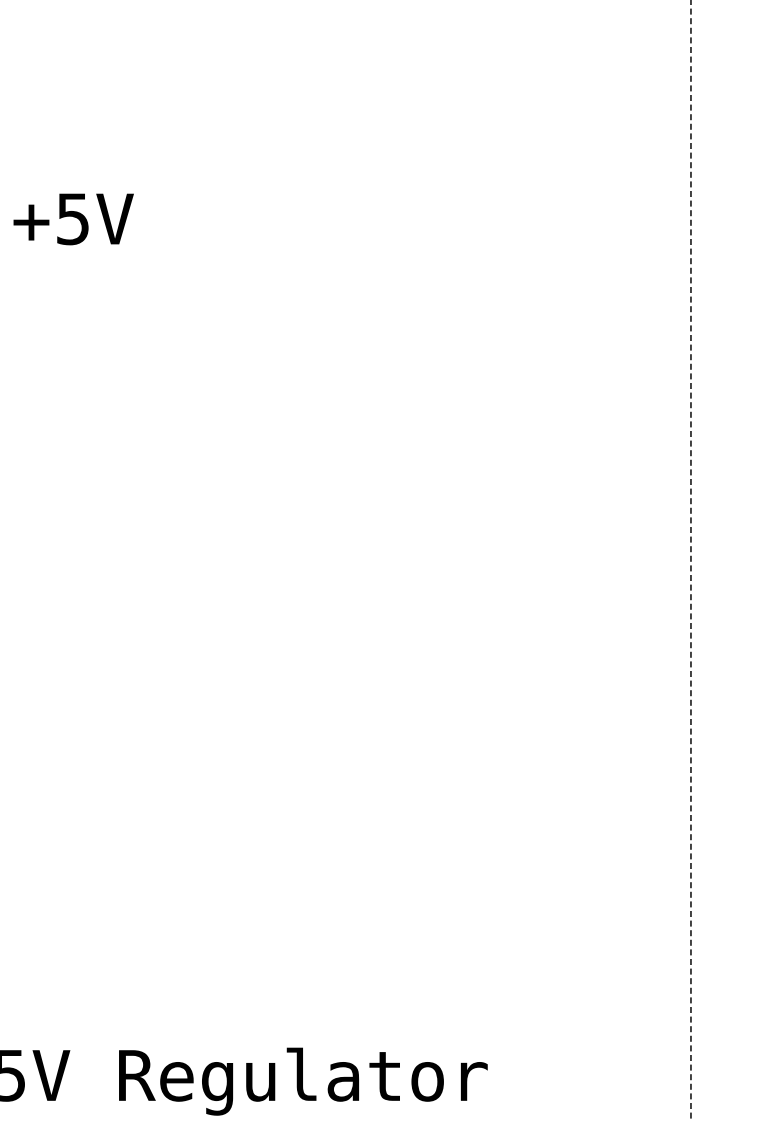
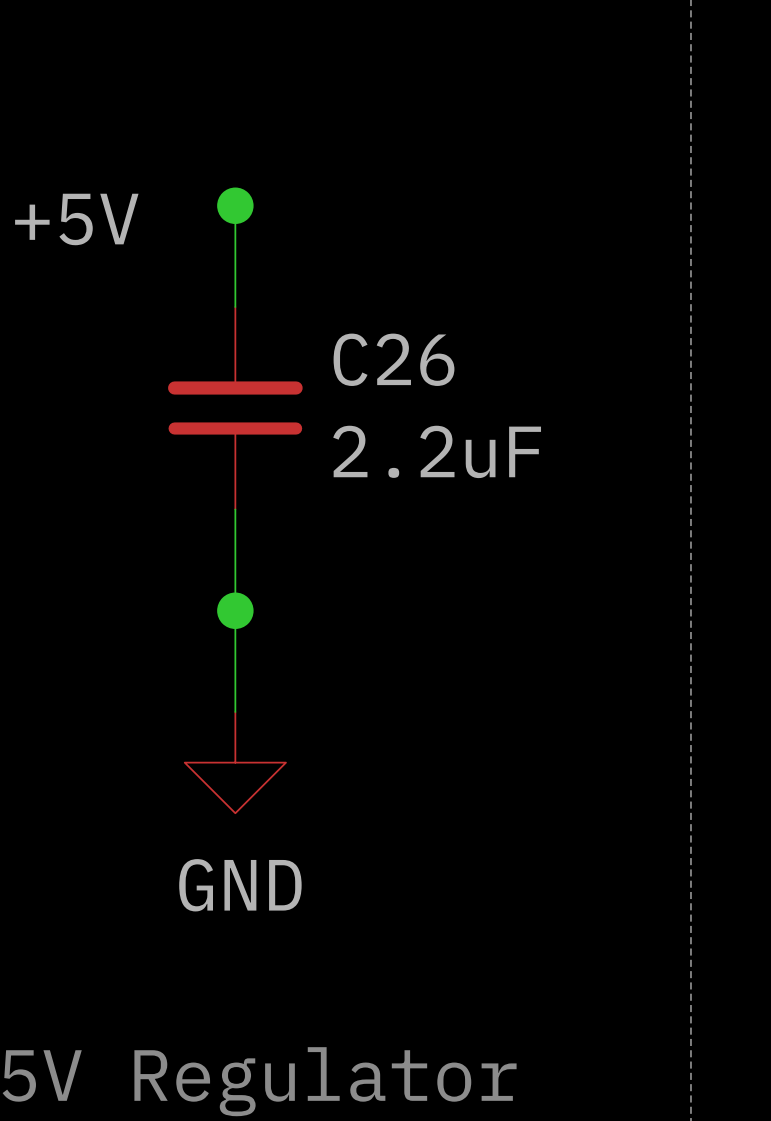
wire: none -> (235, 205) (235, 307)
junction: none -> (235, 205)
C26: none -> 2.2uF (235, 408)
wire: none -> (235, 509) (235, 712)
junction: none -> (235, 610)
power symbol: none -> GND (235, 762)

